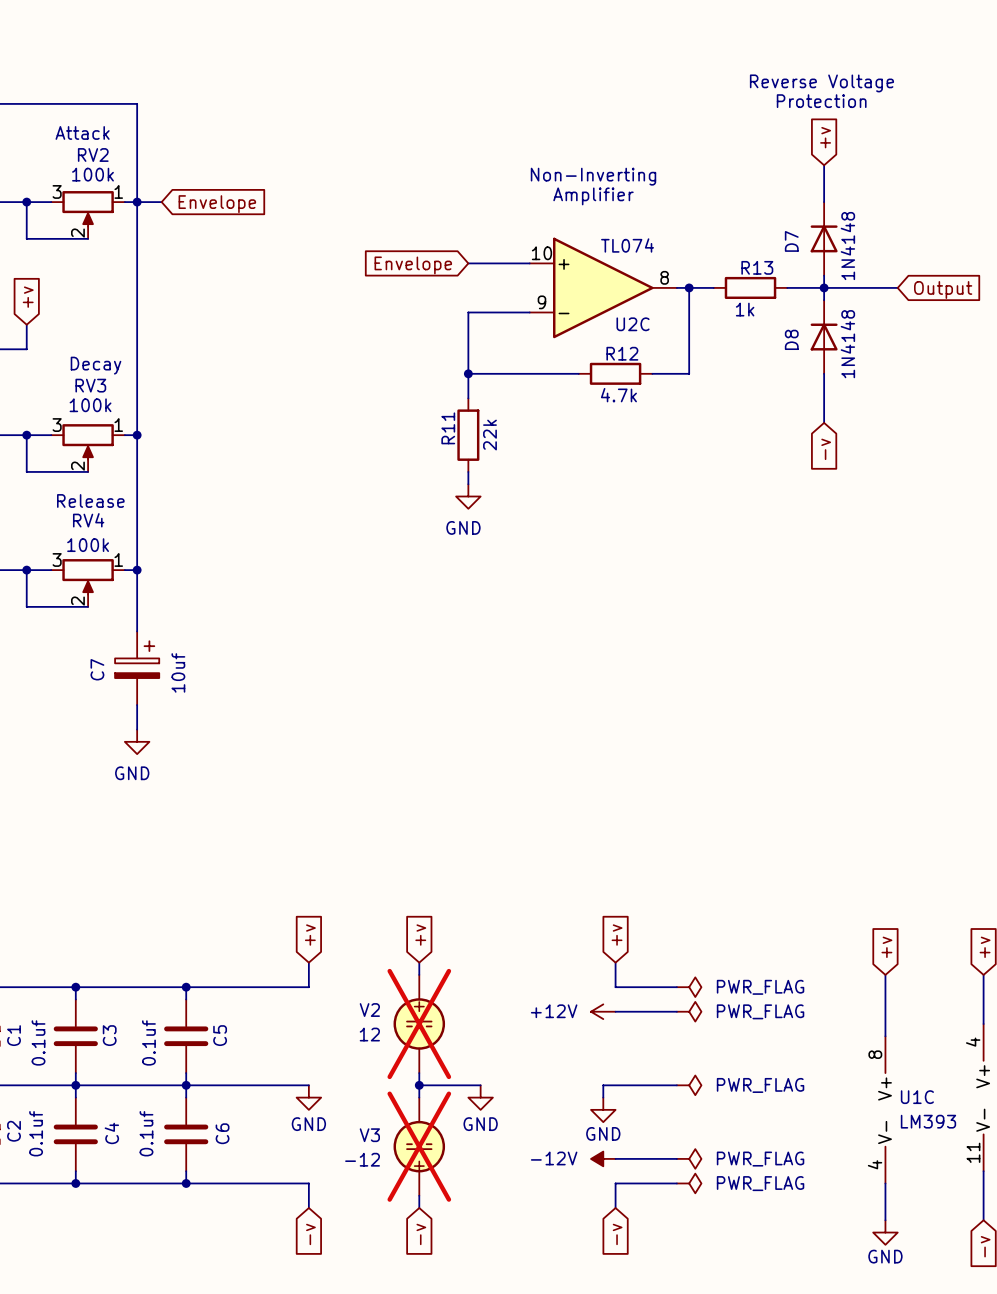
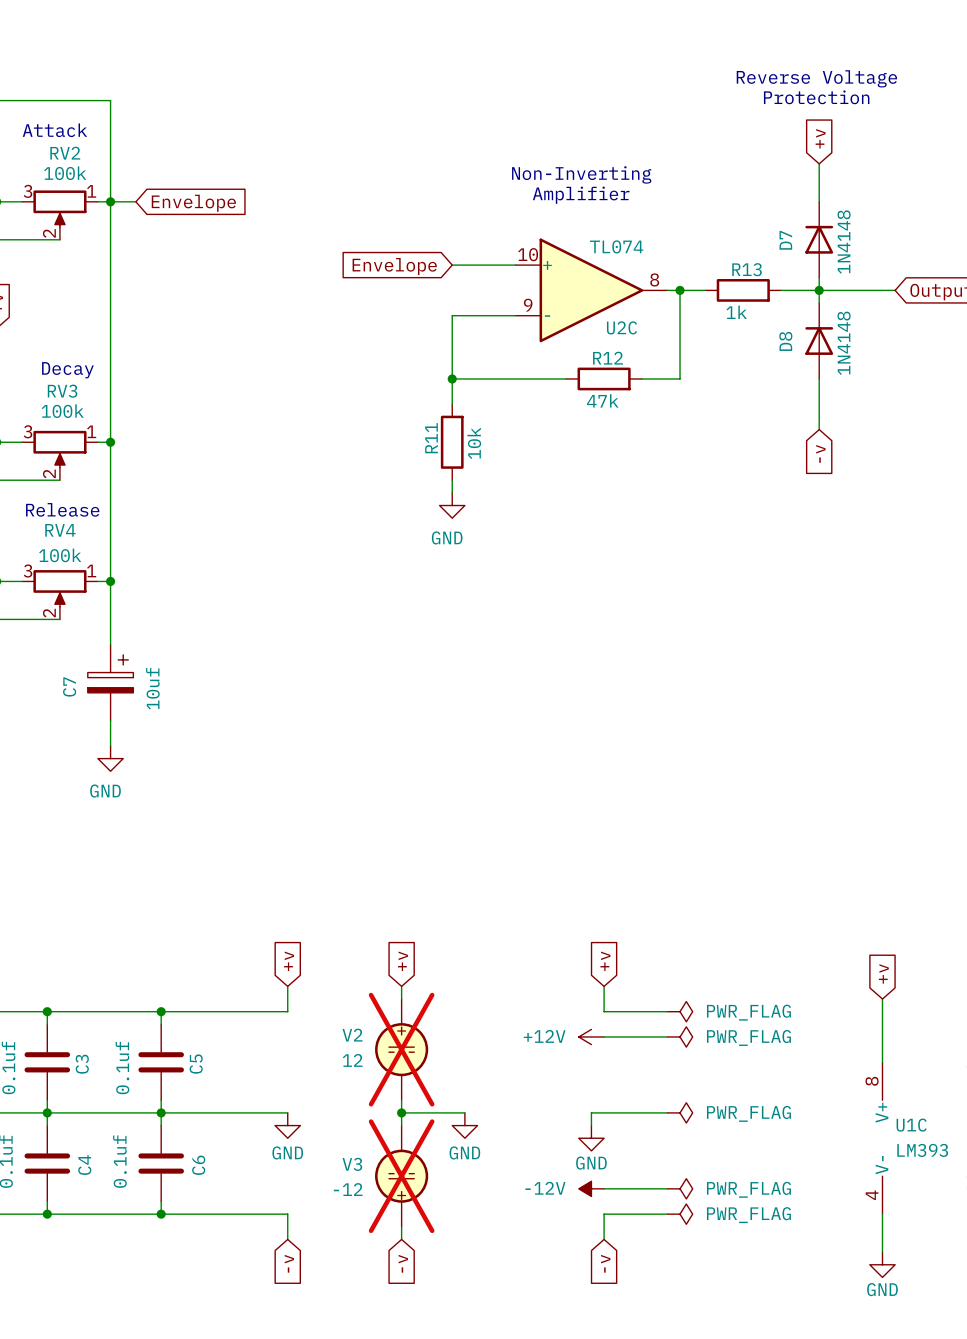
R12 value: 4.7k (618, 395) -> 47k (602, 400)
R11 value: 22k (489, 435) -> 10k (474, 443)

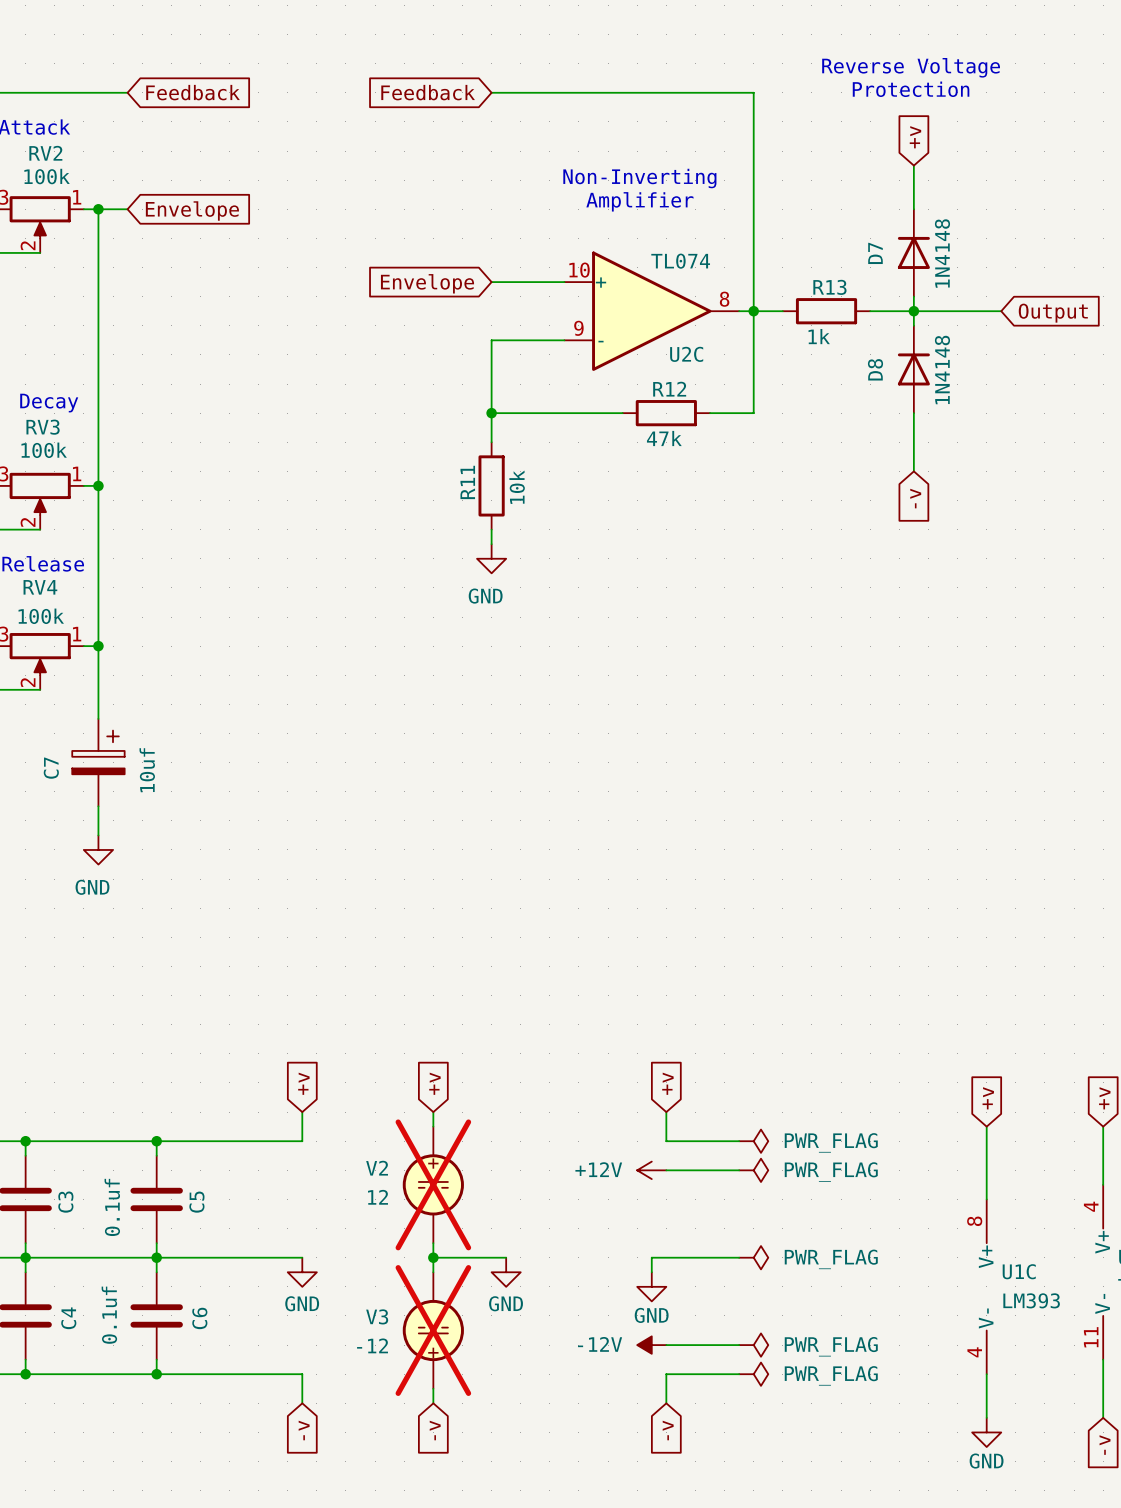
wire: (110, 100) (110, 201) -> (98, 92) (127, 92)
global label: none -> Feedback (193, 92)
global label: none -> Feedback (428, 92)
wire: none -> (491, 92) (753, 92) (753, 311)

